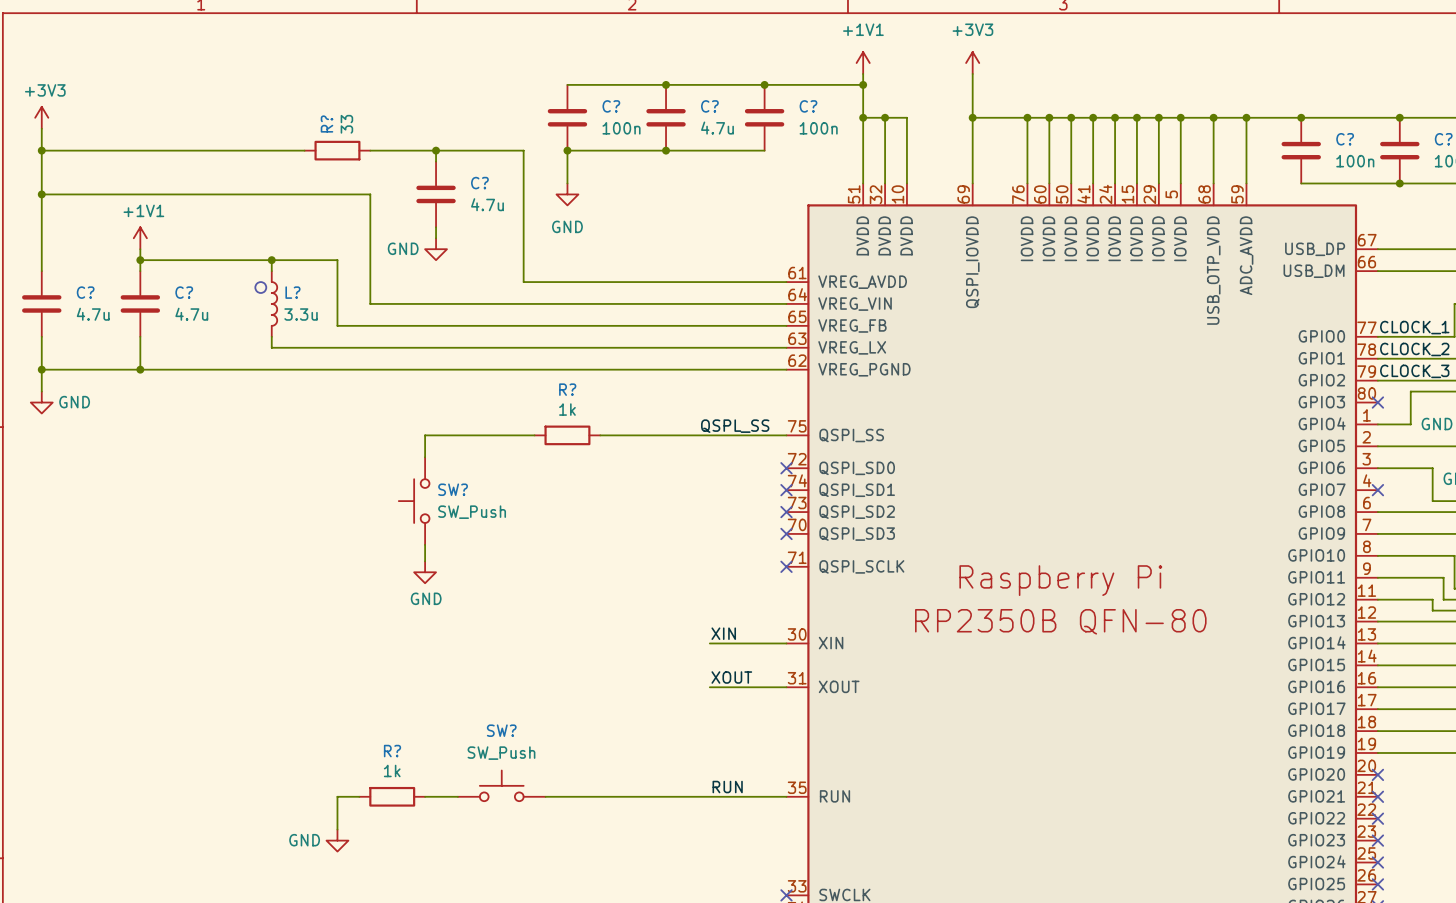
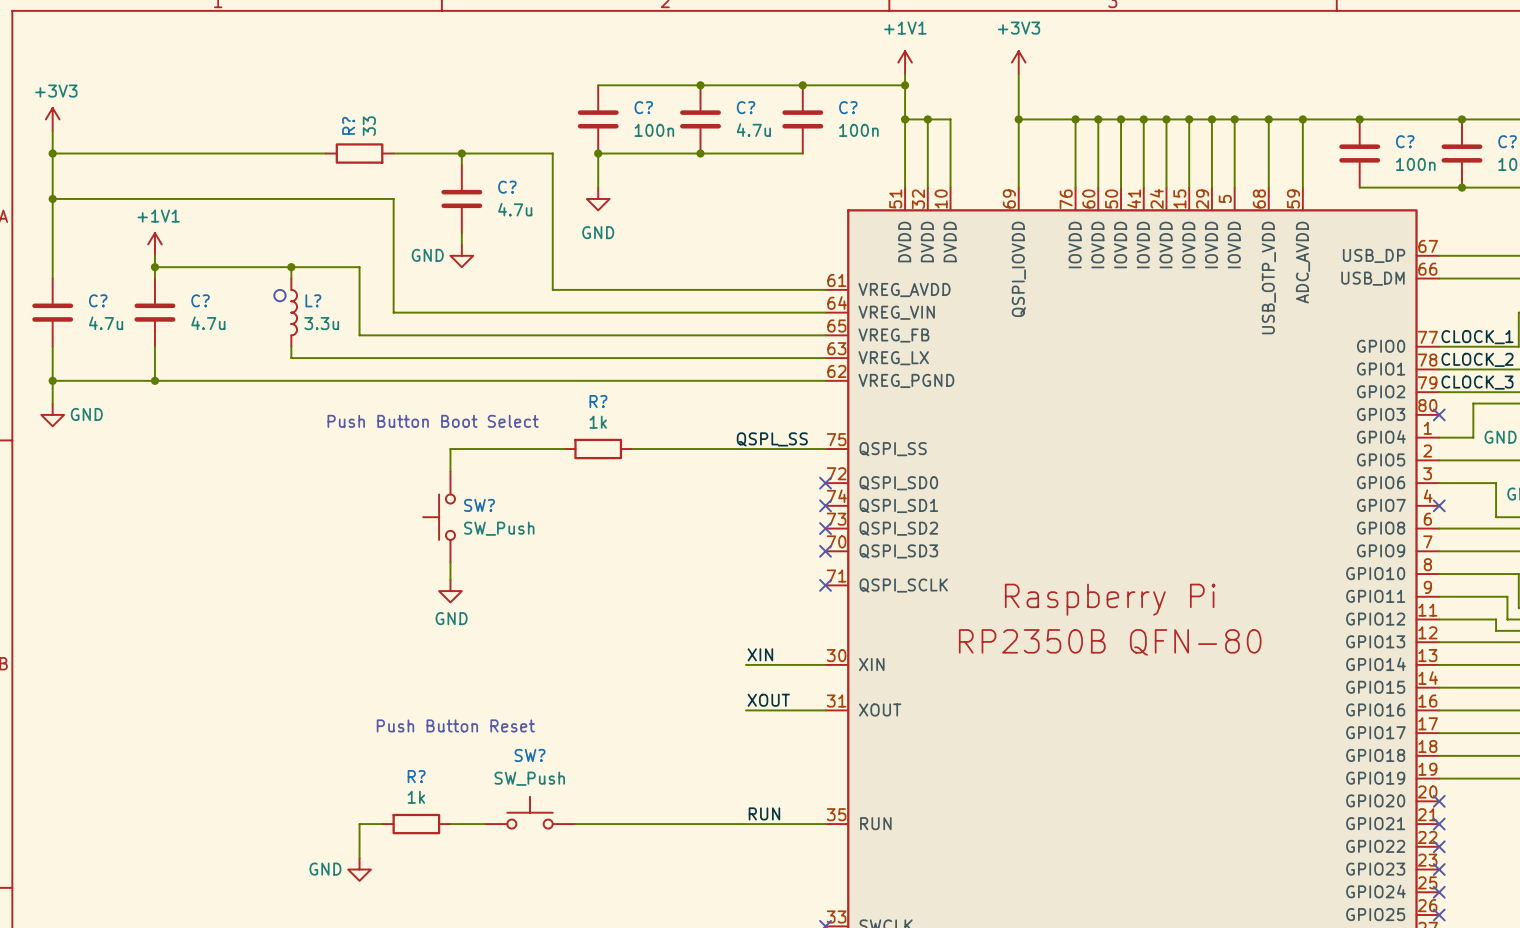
text: none -> Push Button Boot Select (433, 421)
text: none -> Push Button Reset (455, 725)

